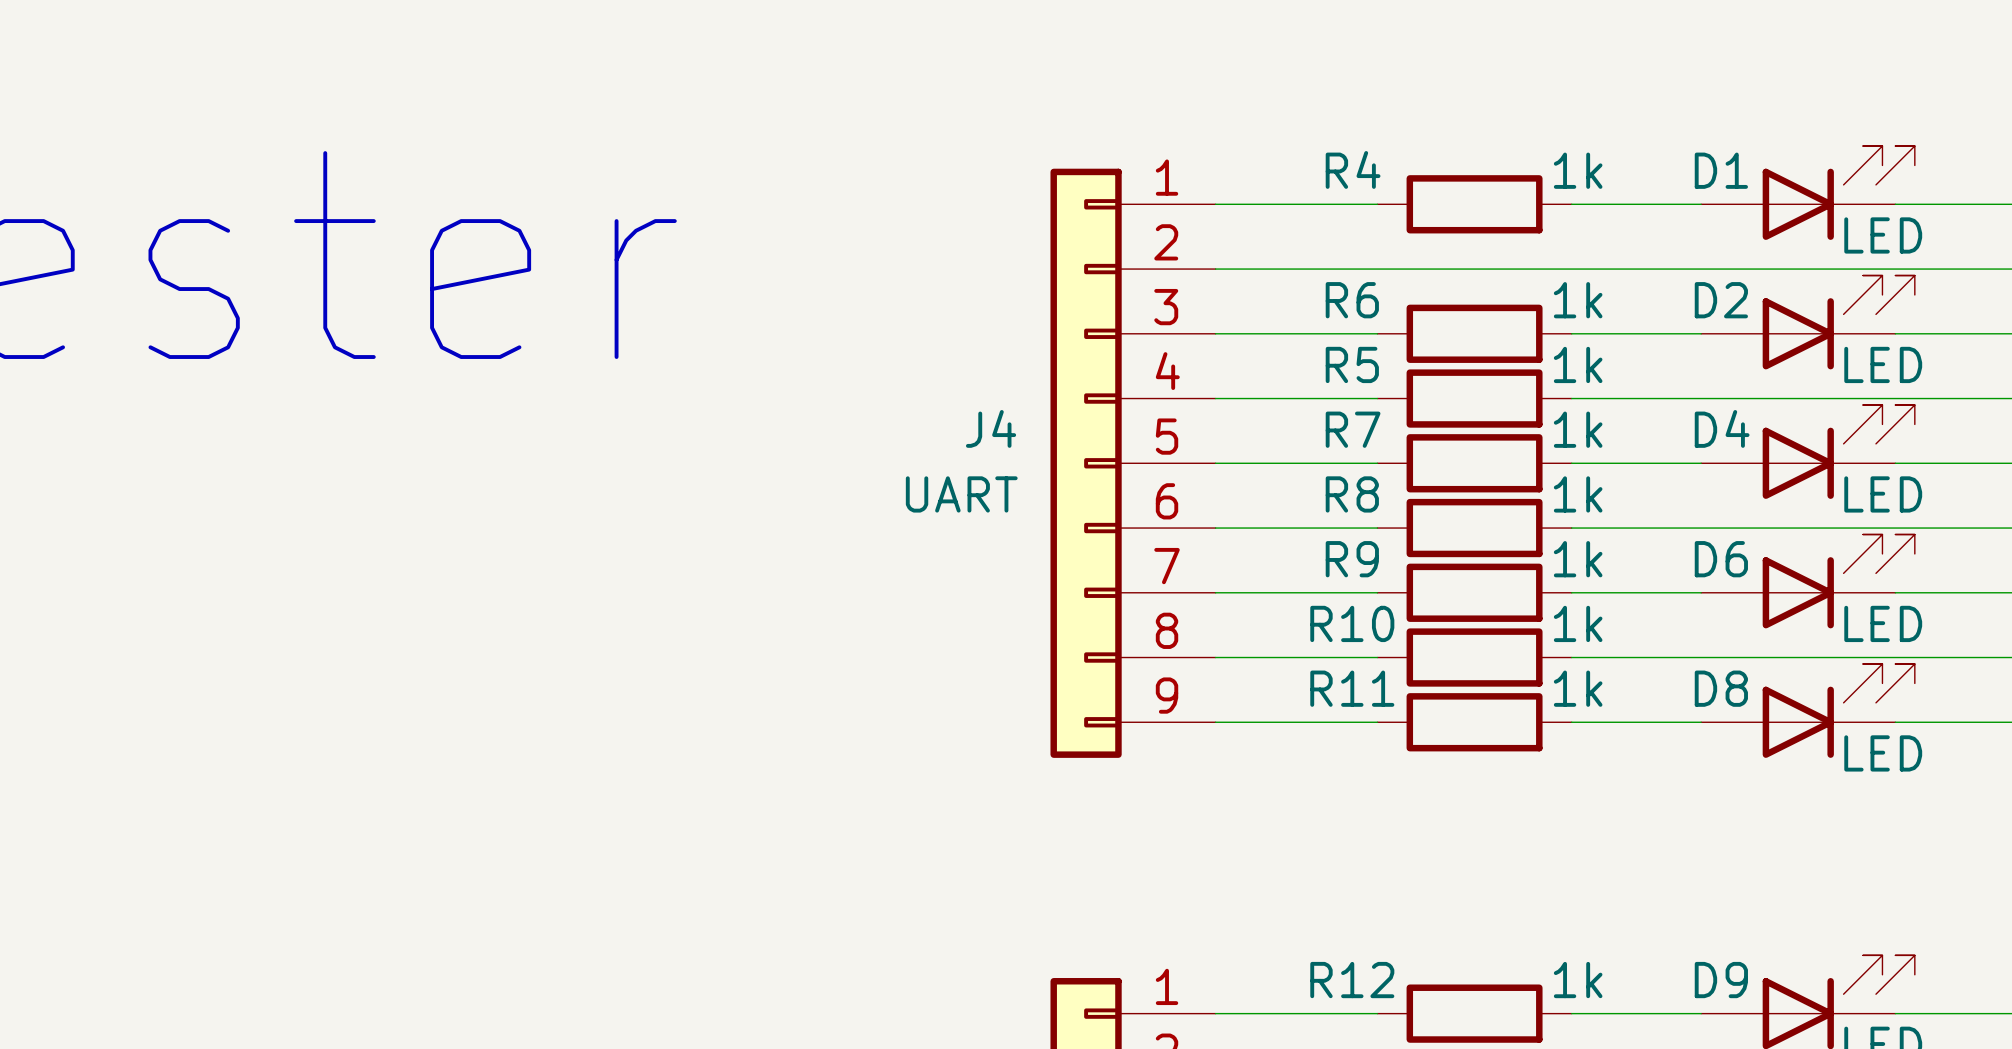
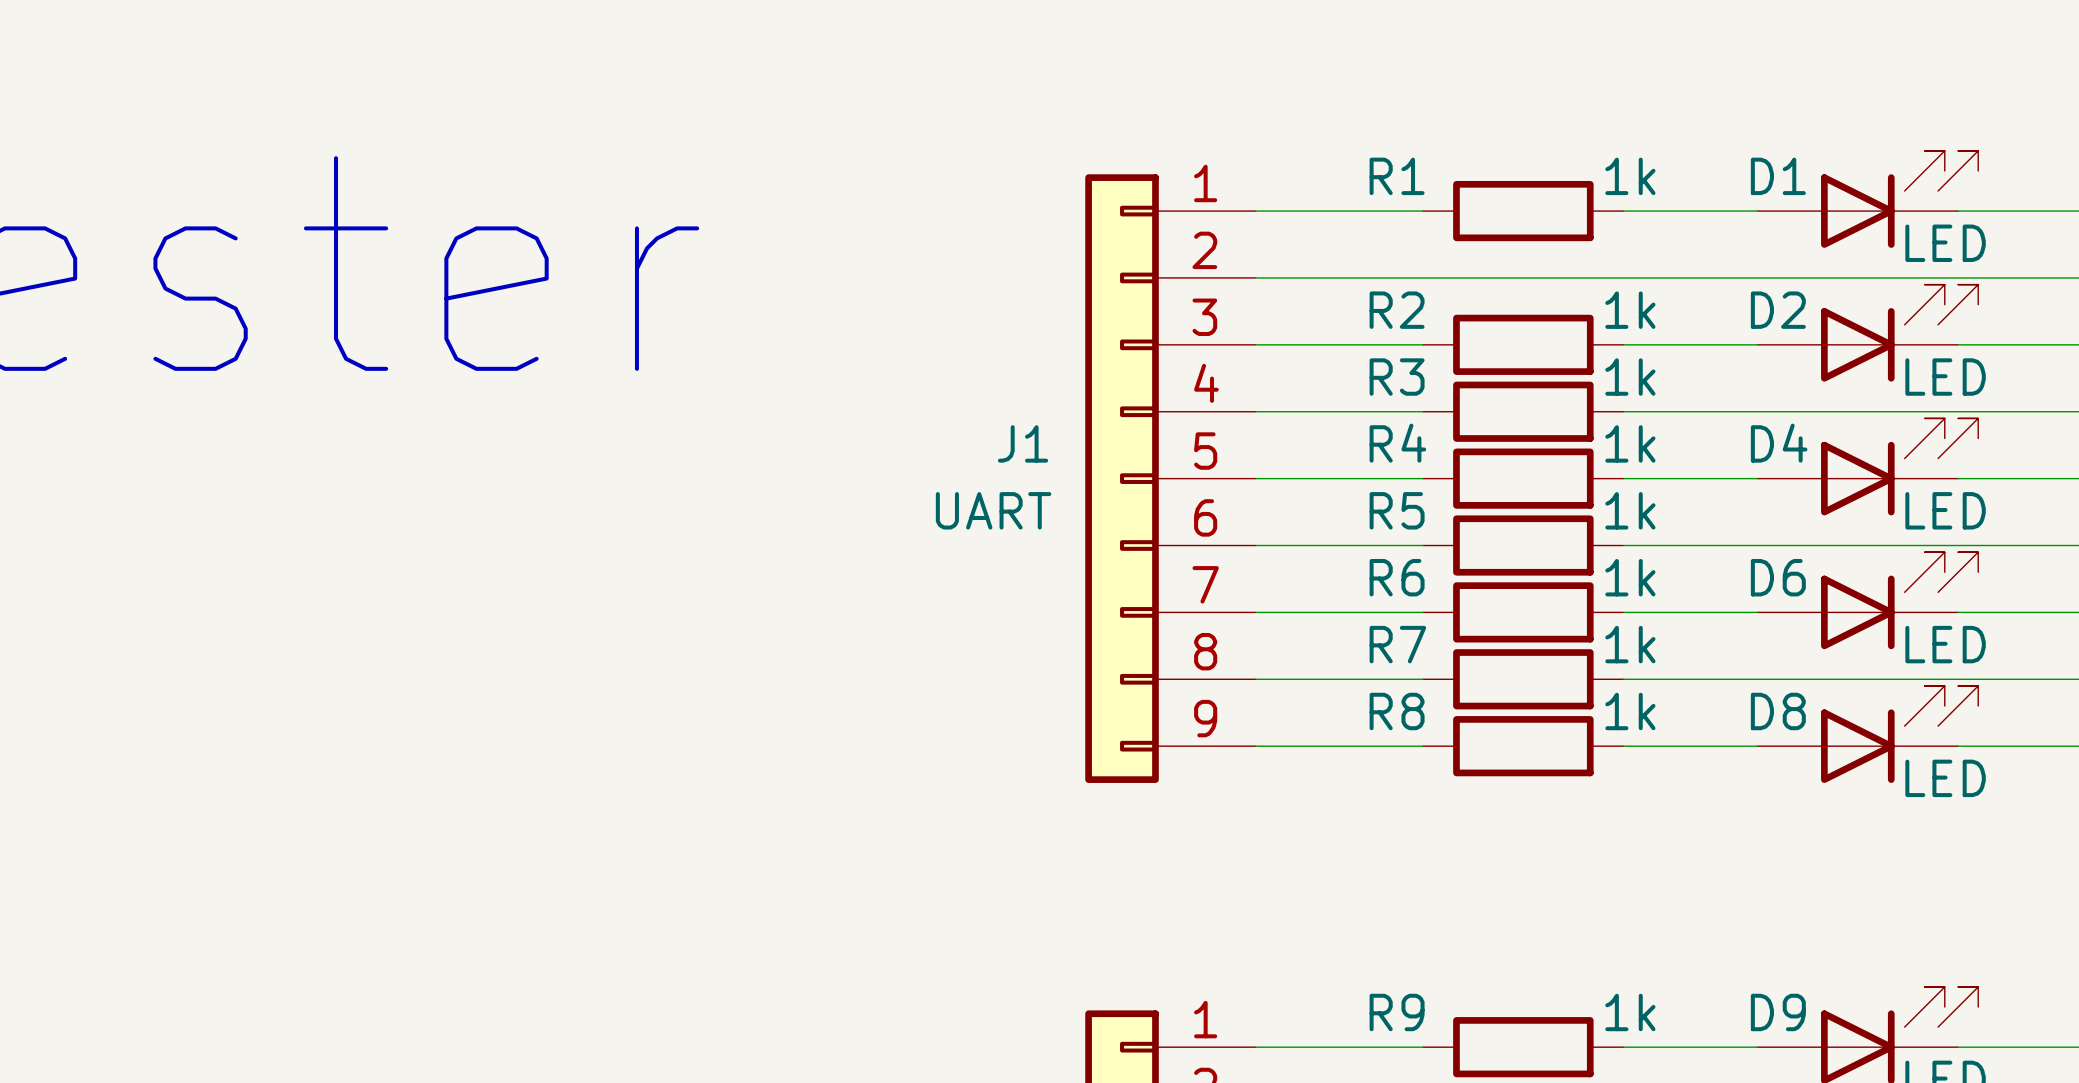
R4 name: R4 (1353, 169) -> R1 (1397, 176)
R6 name: R6 (1352, 300) -> R2 (1397, 310)
R5 name: R5 (1352, 364) -> R3 (1397, 377)
J4 name: J4 (991, 428) -> J1 (1023, 443)
R7 name: R7 (1353, 429) -> R4 (1397, 443)
R8 name: R8 (1352, 494) -> R5 (1397, 510)
R9 name: R9 (1352, 559) -> R6 (1397, 577)
R10 name: R10 (1352, 623) -> R7 (1397, 644)
R11 name: R11 (1352, 688) -> R8 (1397, 711)
R12 name: R12 (1352, 980) -> R9 (1397, 1012)

